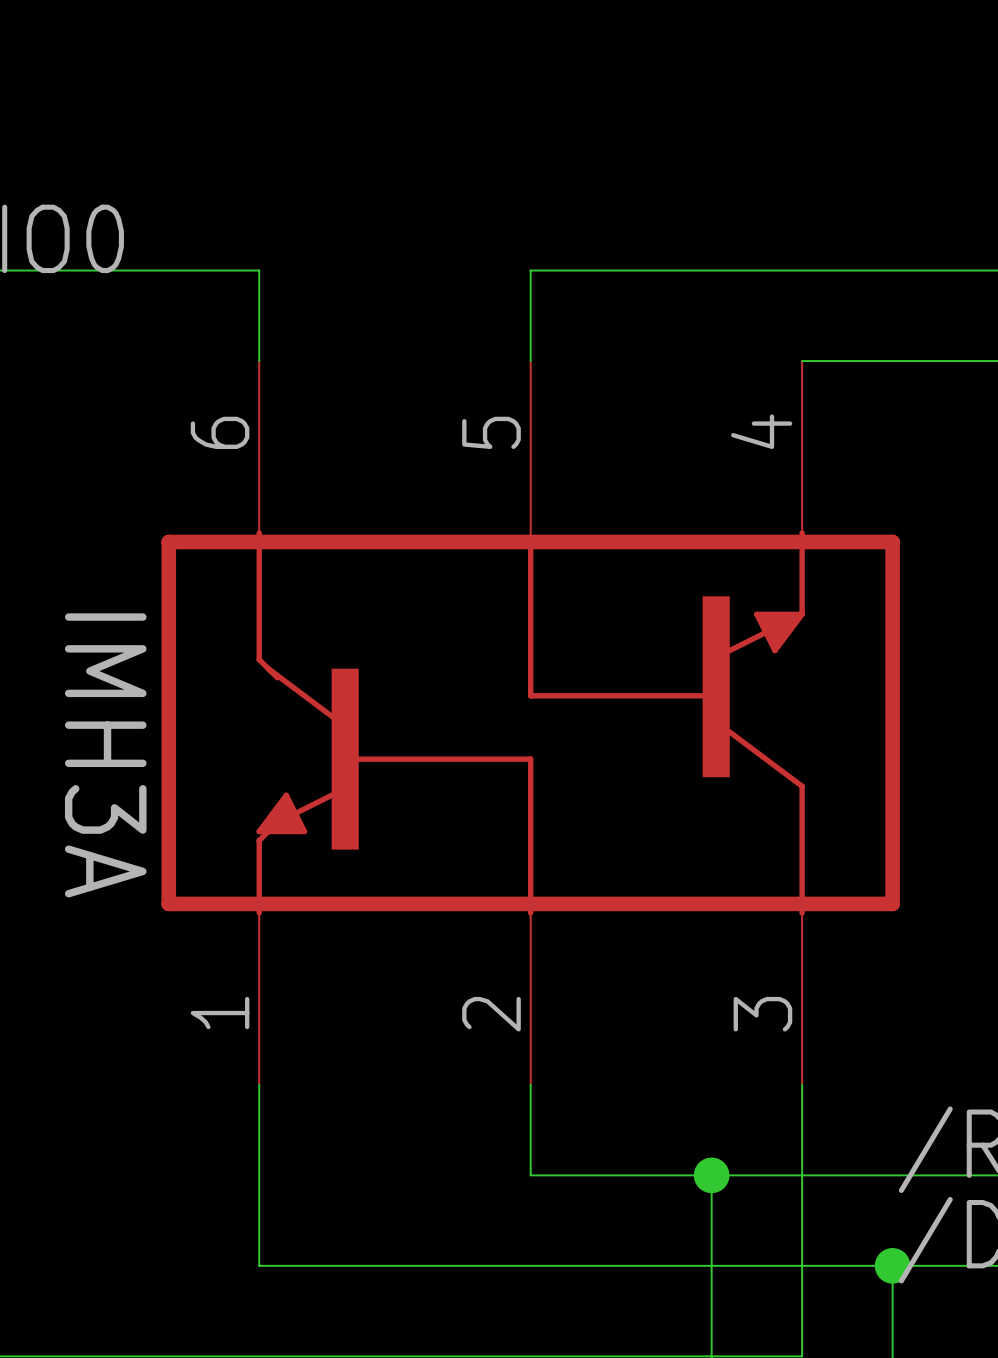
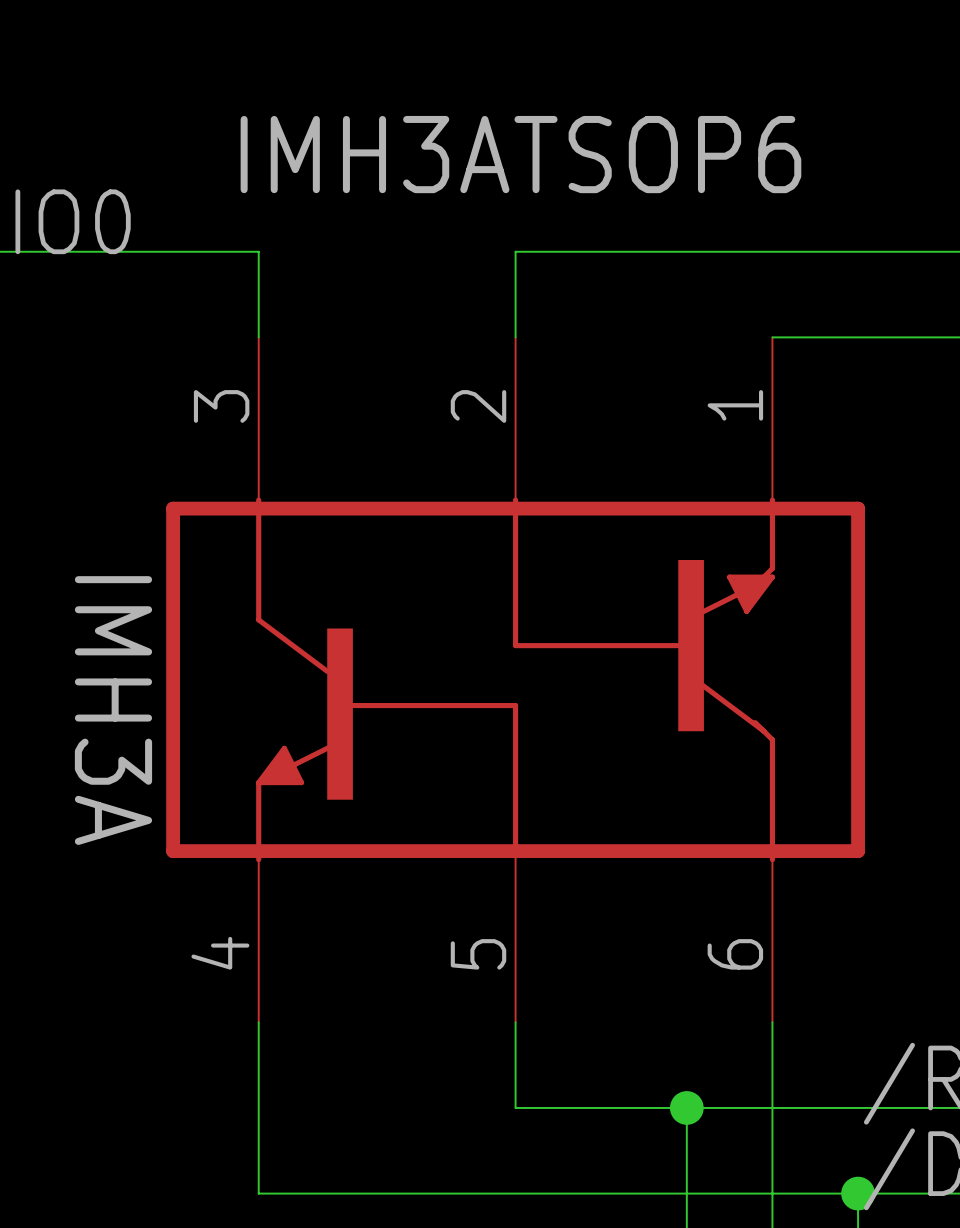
IMH3A value: none -> IMH3ATSOP6 (520, 154)
IMH3A rotation: 0° (530, 722) -> 180° (515, 679)

